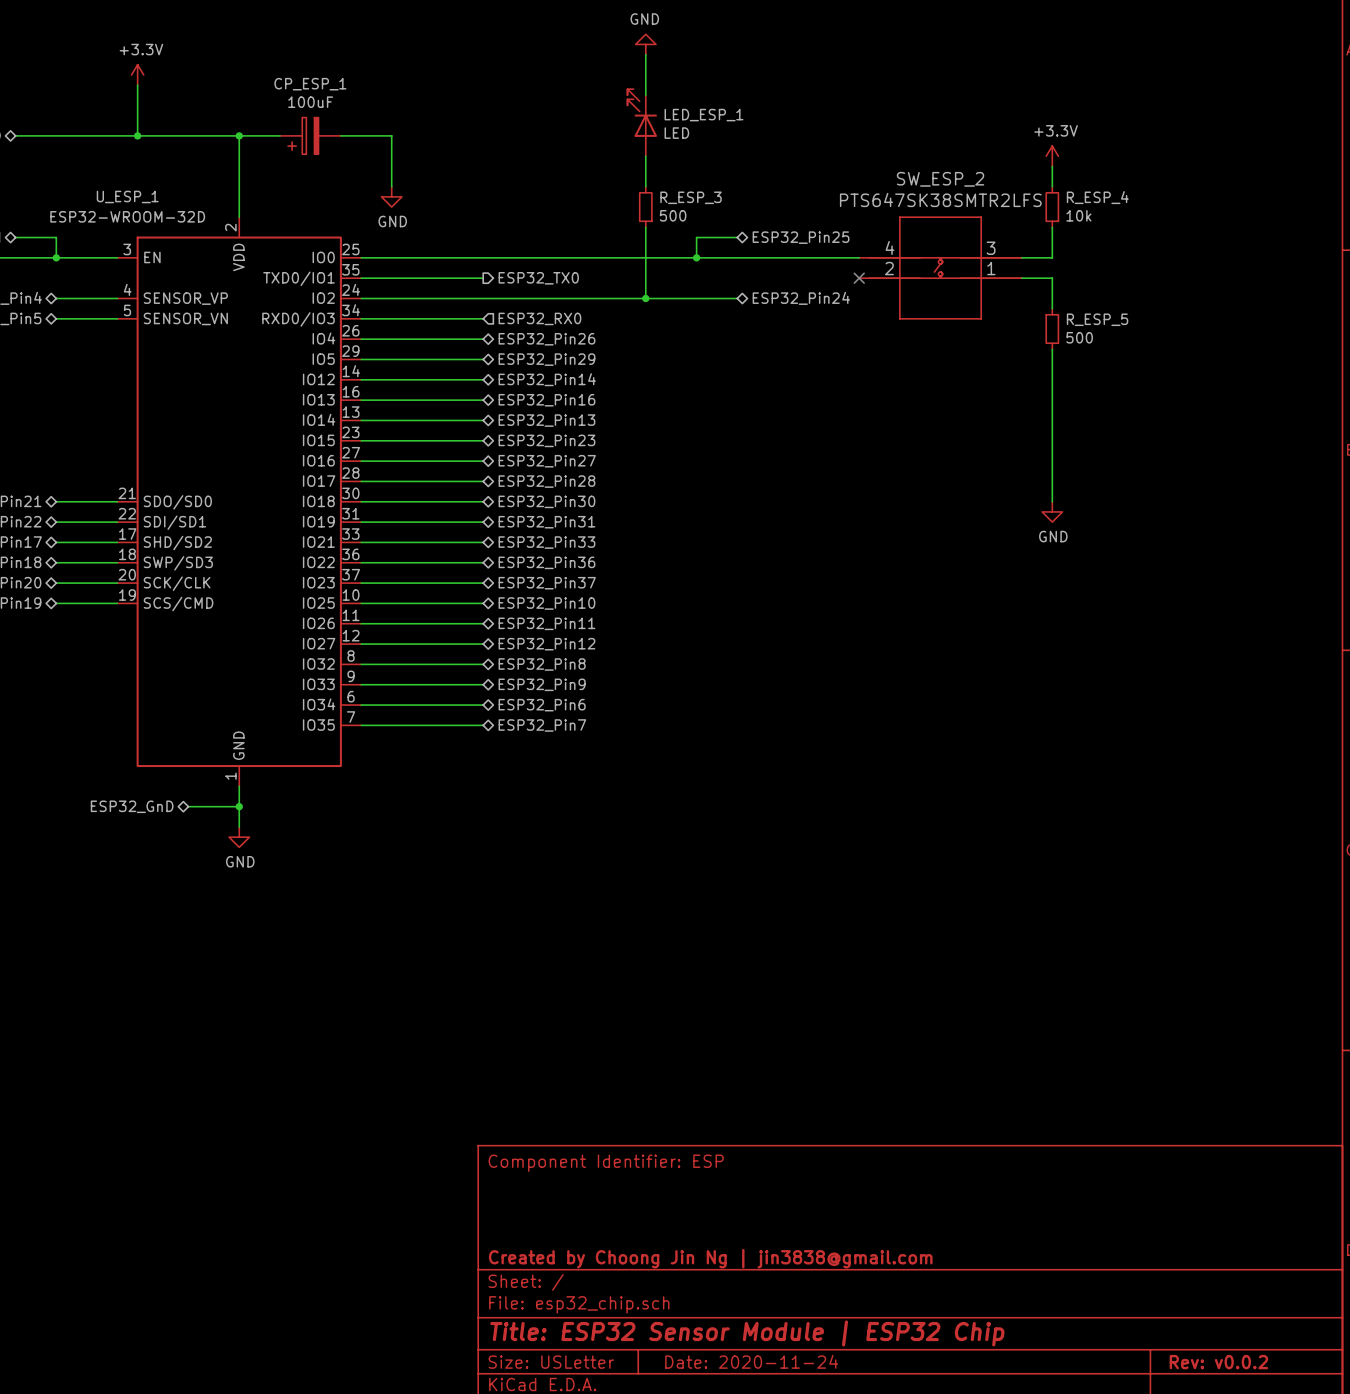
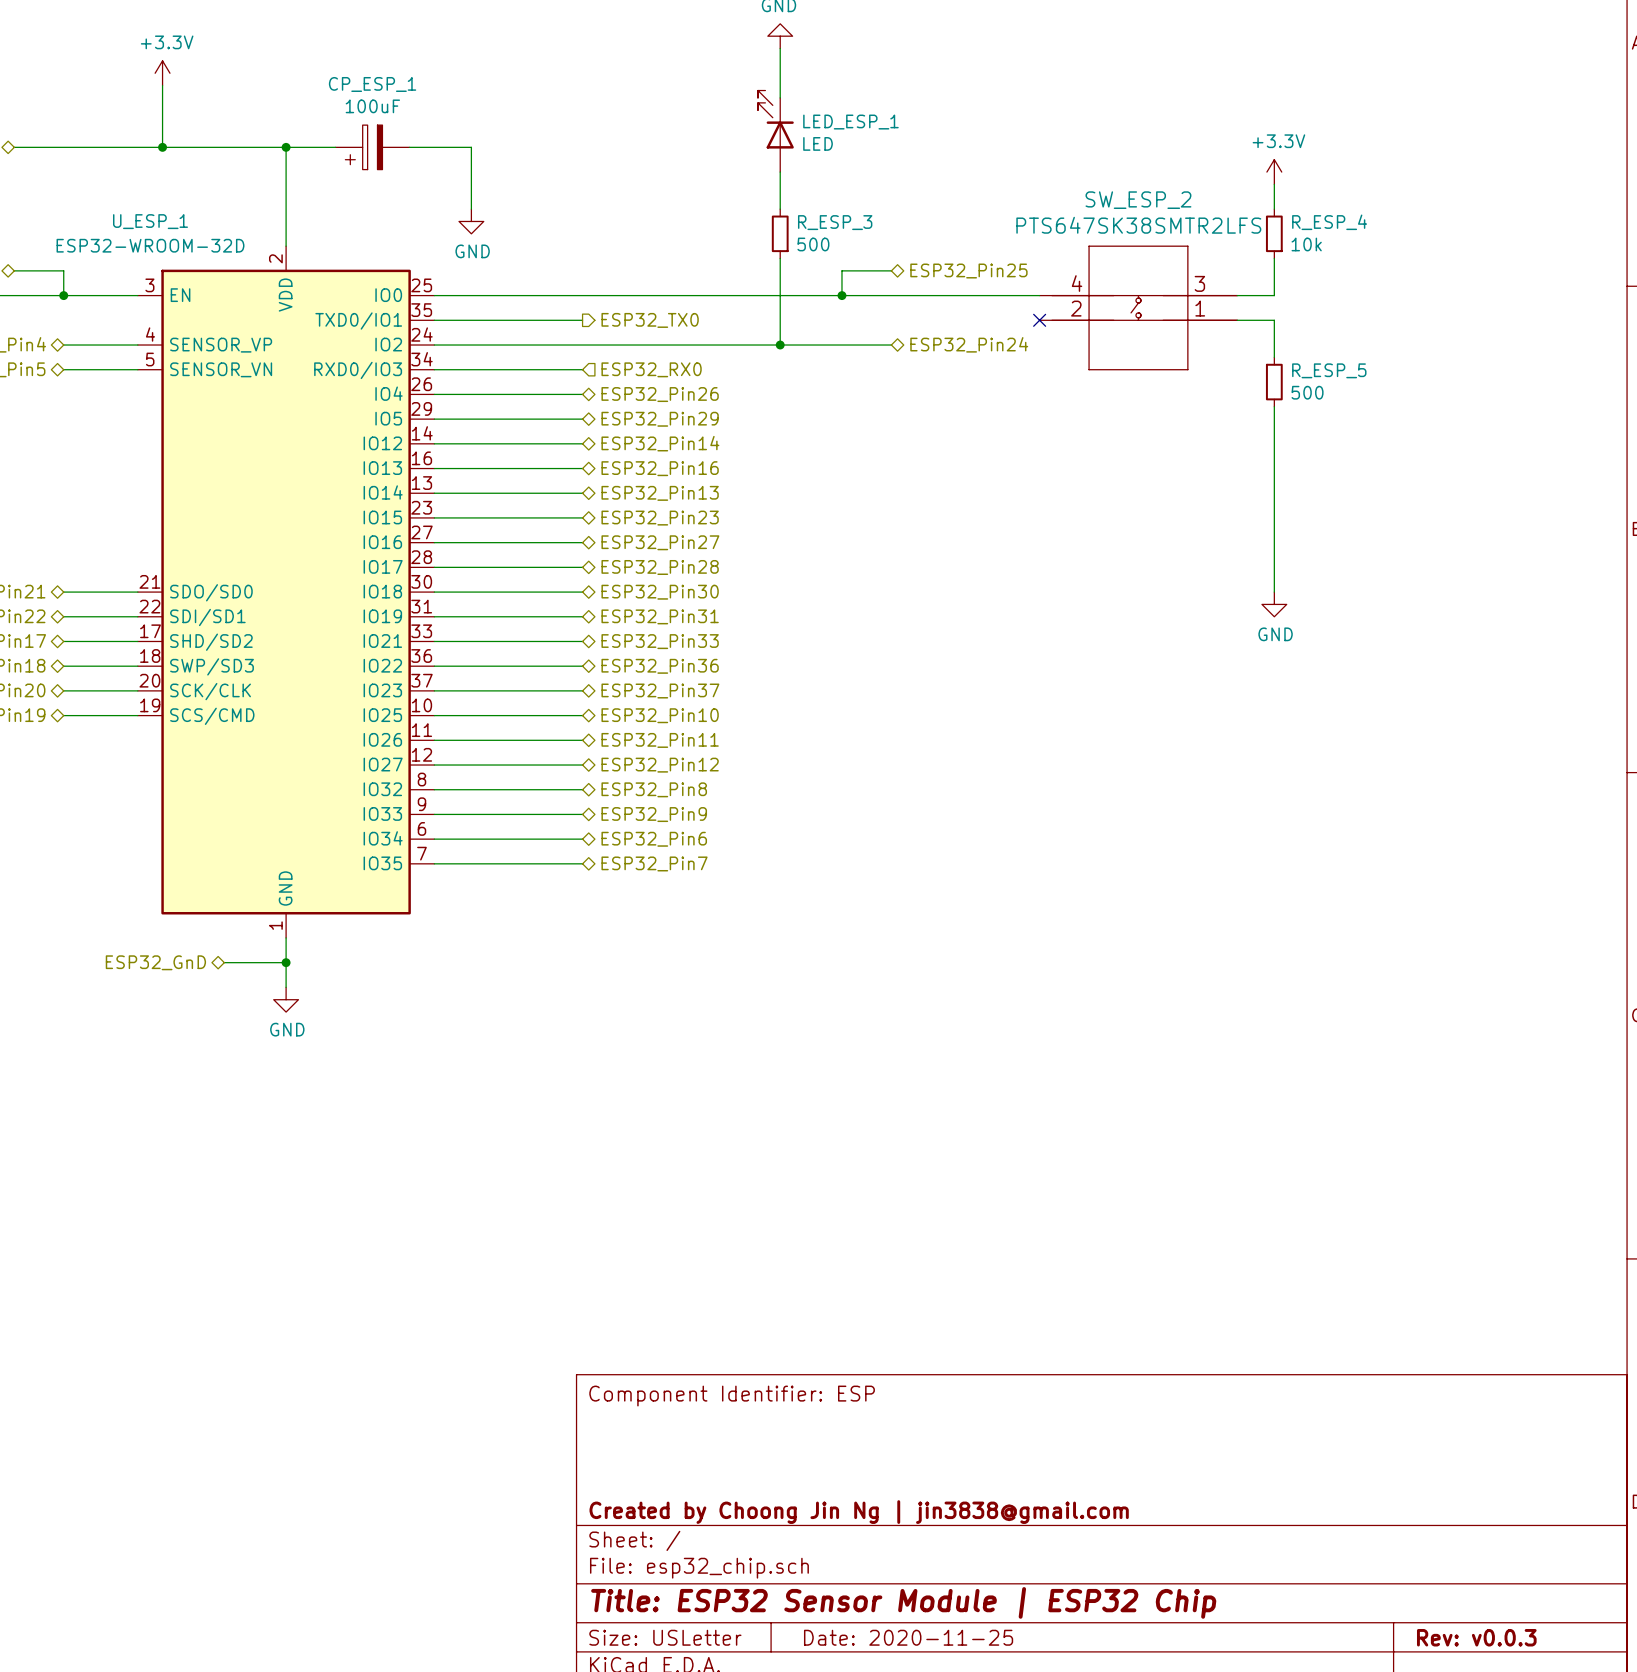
title block: Date: 2020-11-24 (751, 1361) -> Date: 2020-11-25 (908, 1637)
title block: Rev: v0.0.2 (1218, 1362) -> Rev: v0.0.3 (1476, 1637)

